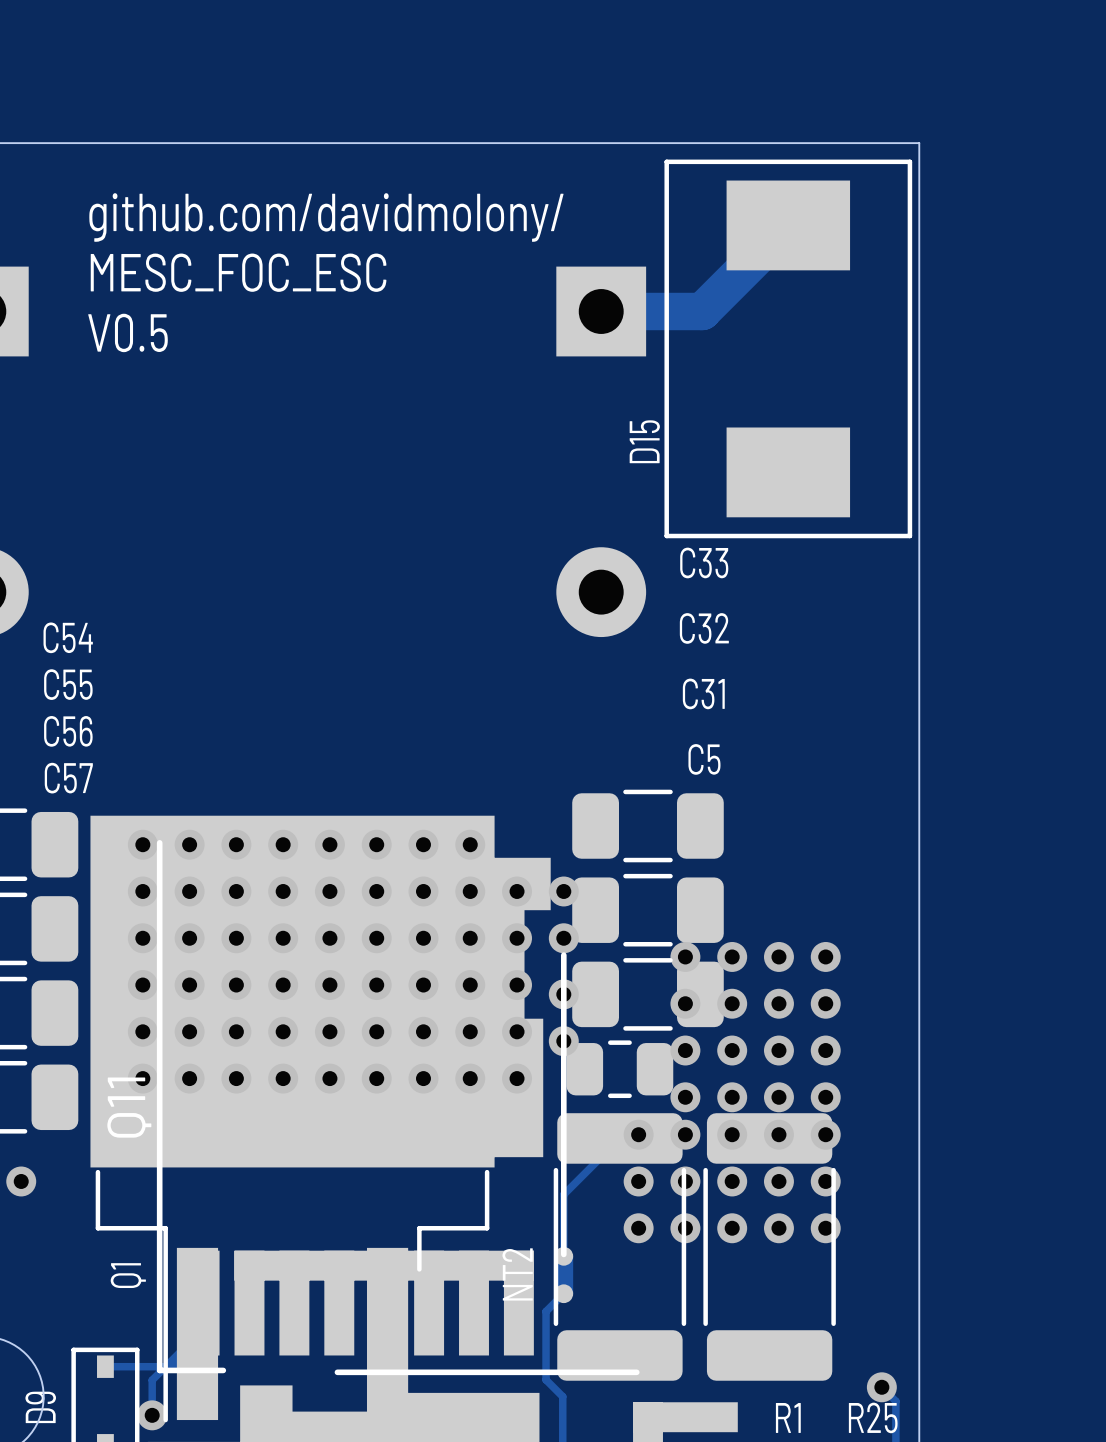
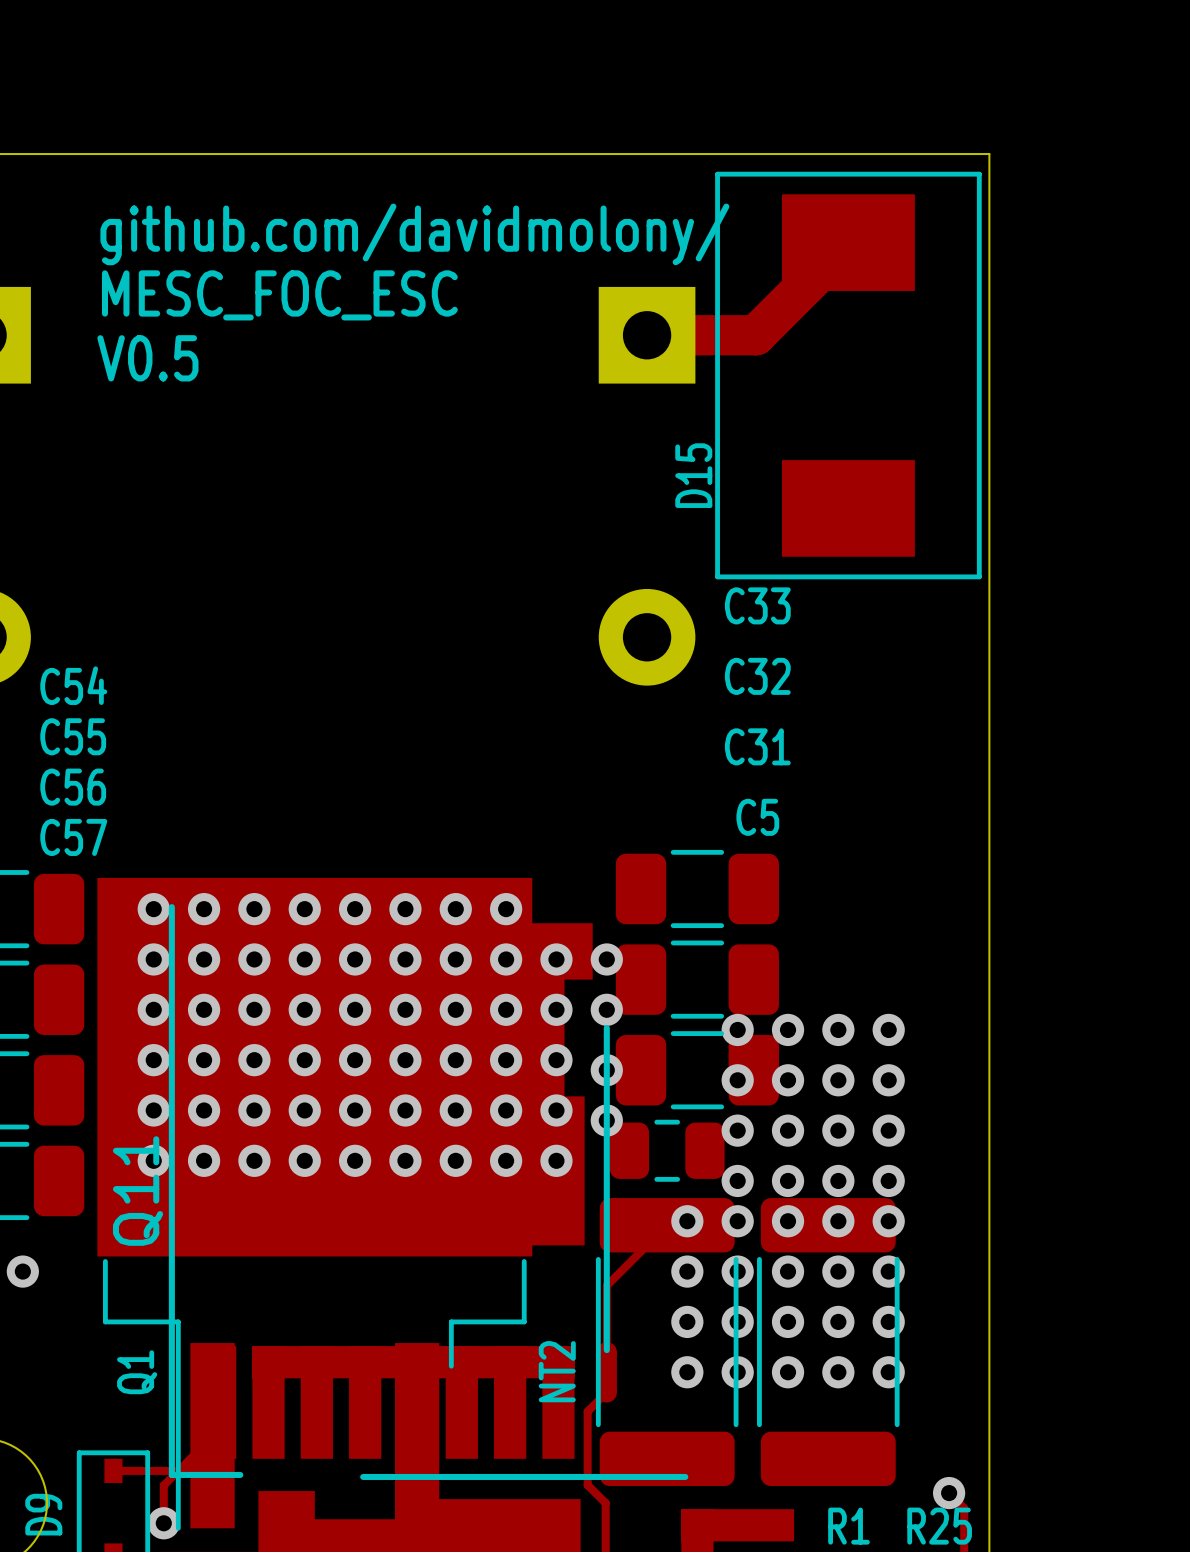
via: none -> (687, 1372)
via: none -> (737, 1372)
via: none -> (788, 1372)
via: none -> (838, 1372)
via: none -> (888, 1372)

